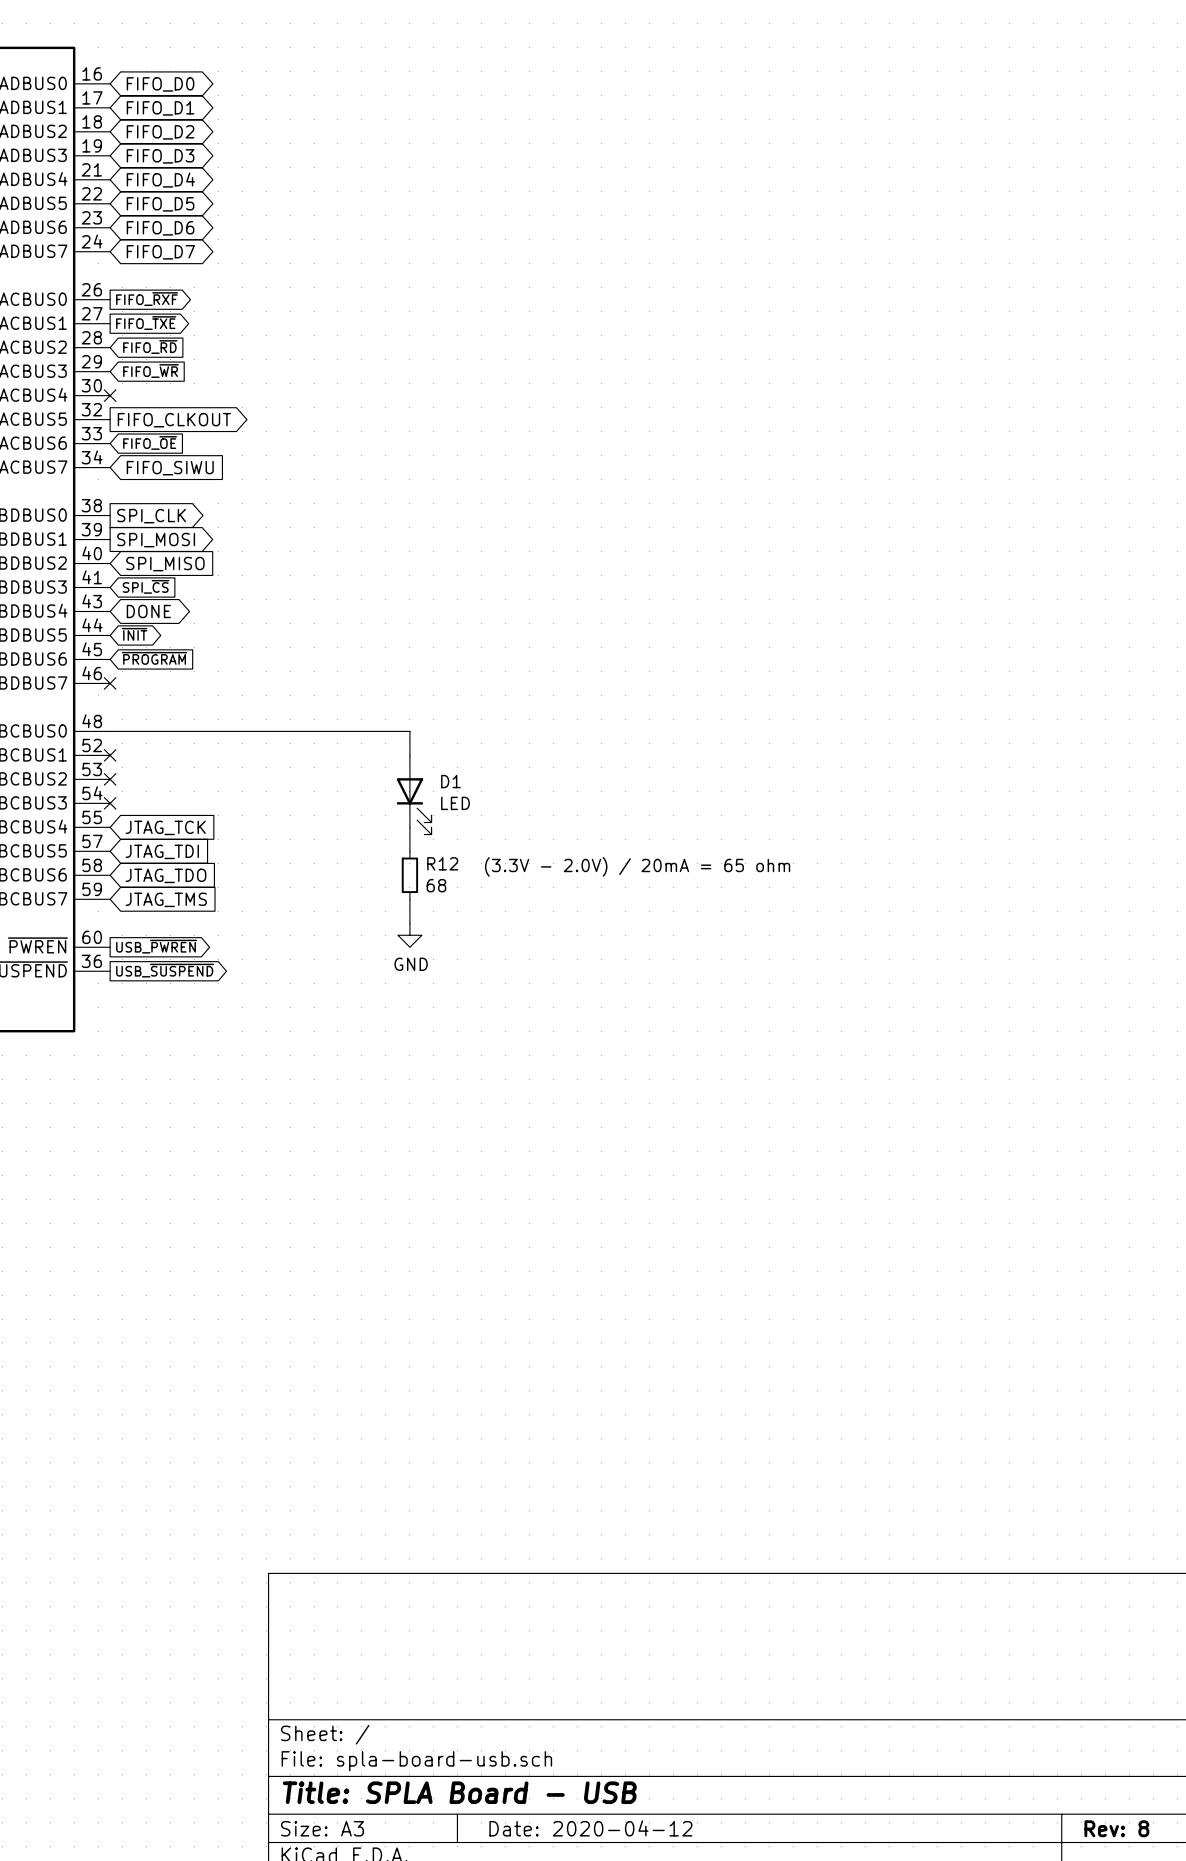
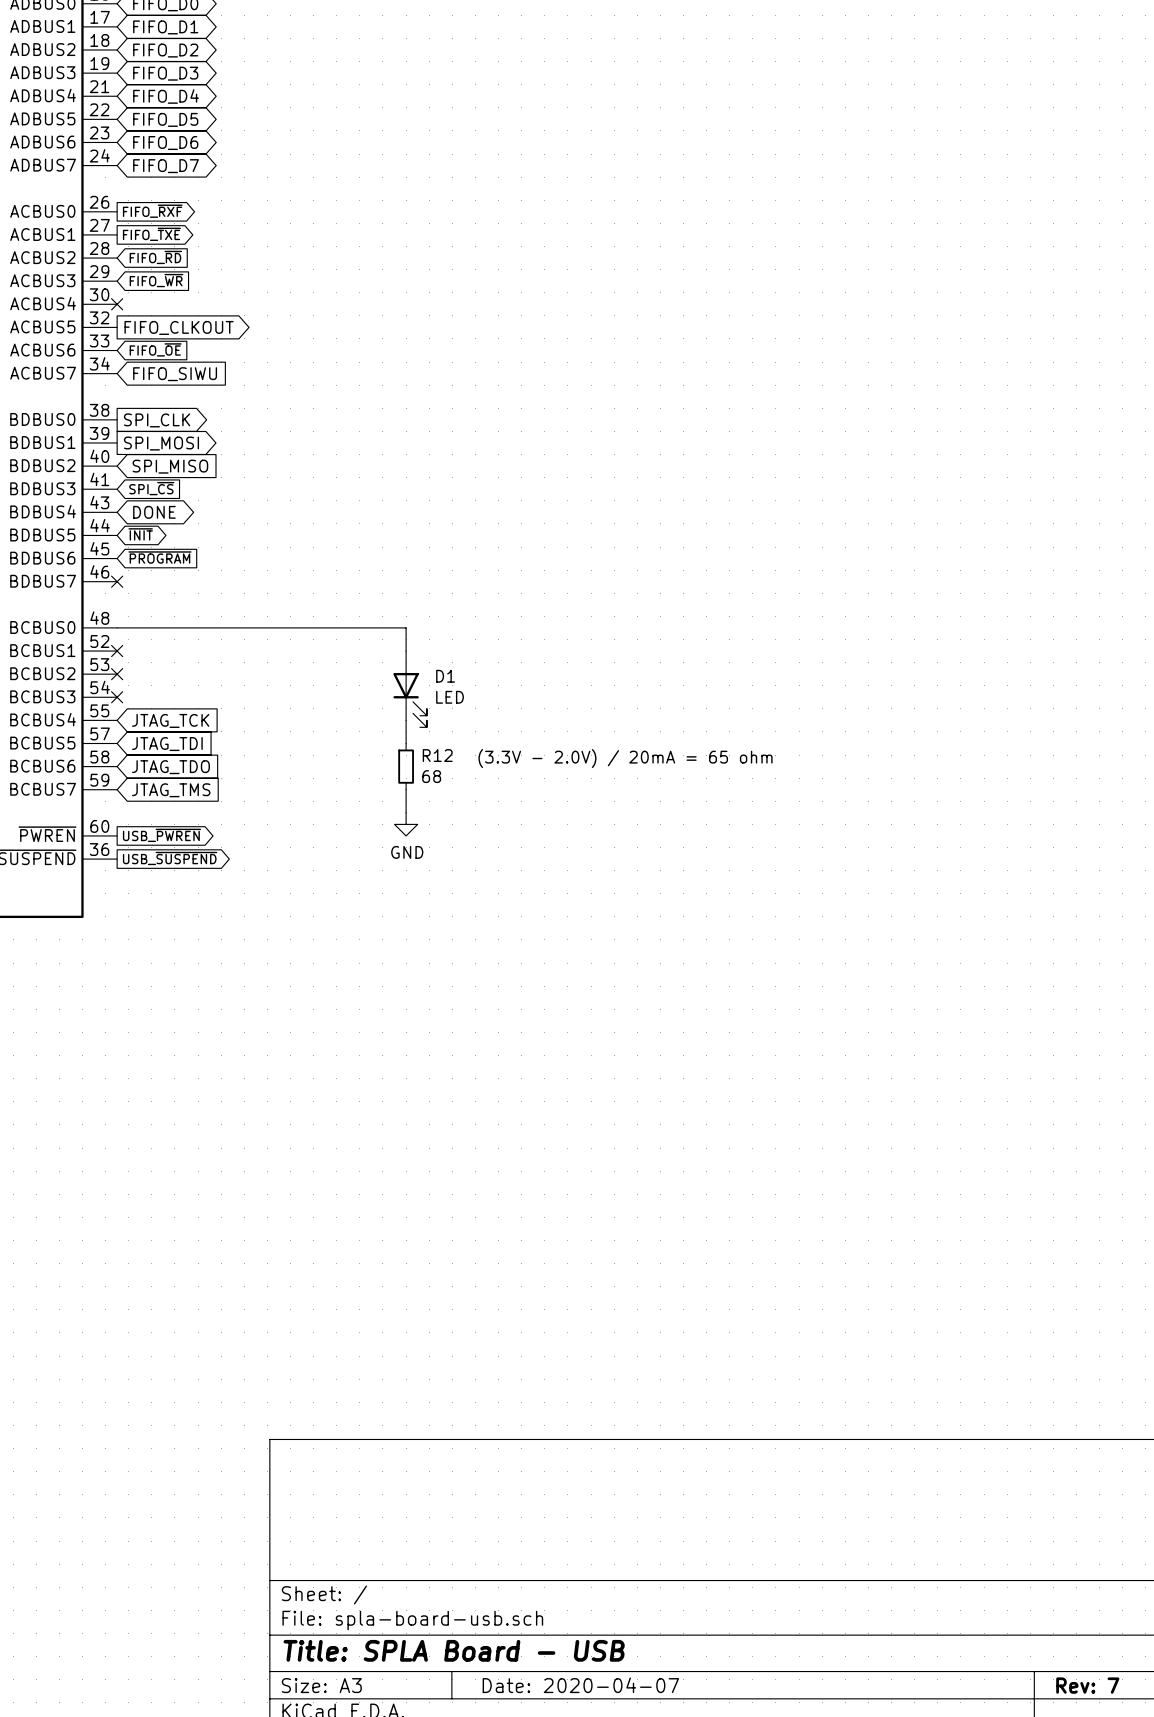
title block: Date: 2020-04-12 (590, 1828) -> Date: 2020-04-07 (580, 1685)
title block: Rev: 8 (1116, 1828) -> Rev: 7 (1087, 1685)

